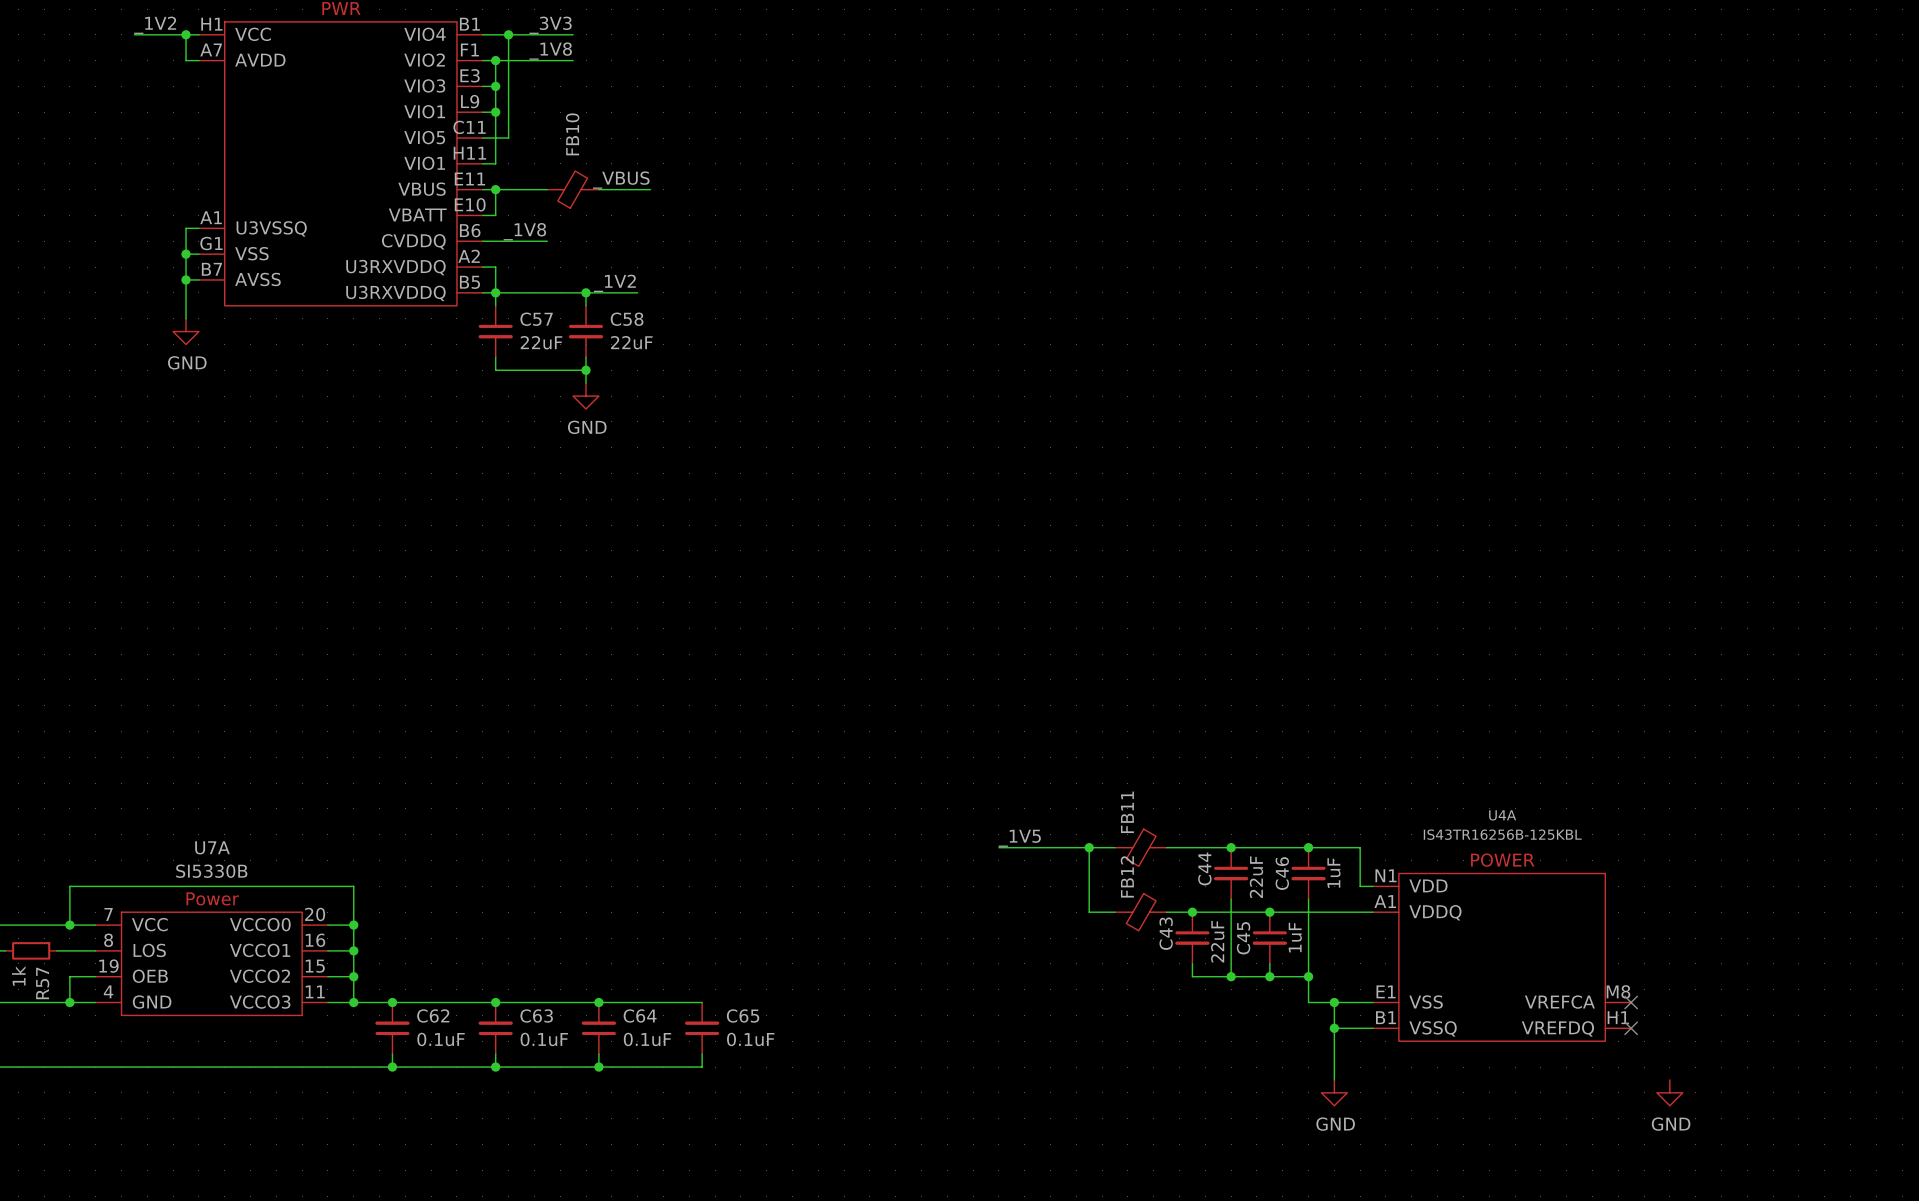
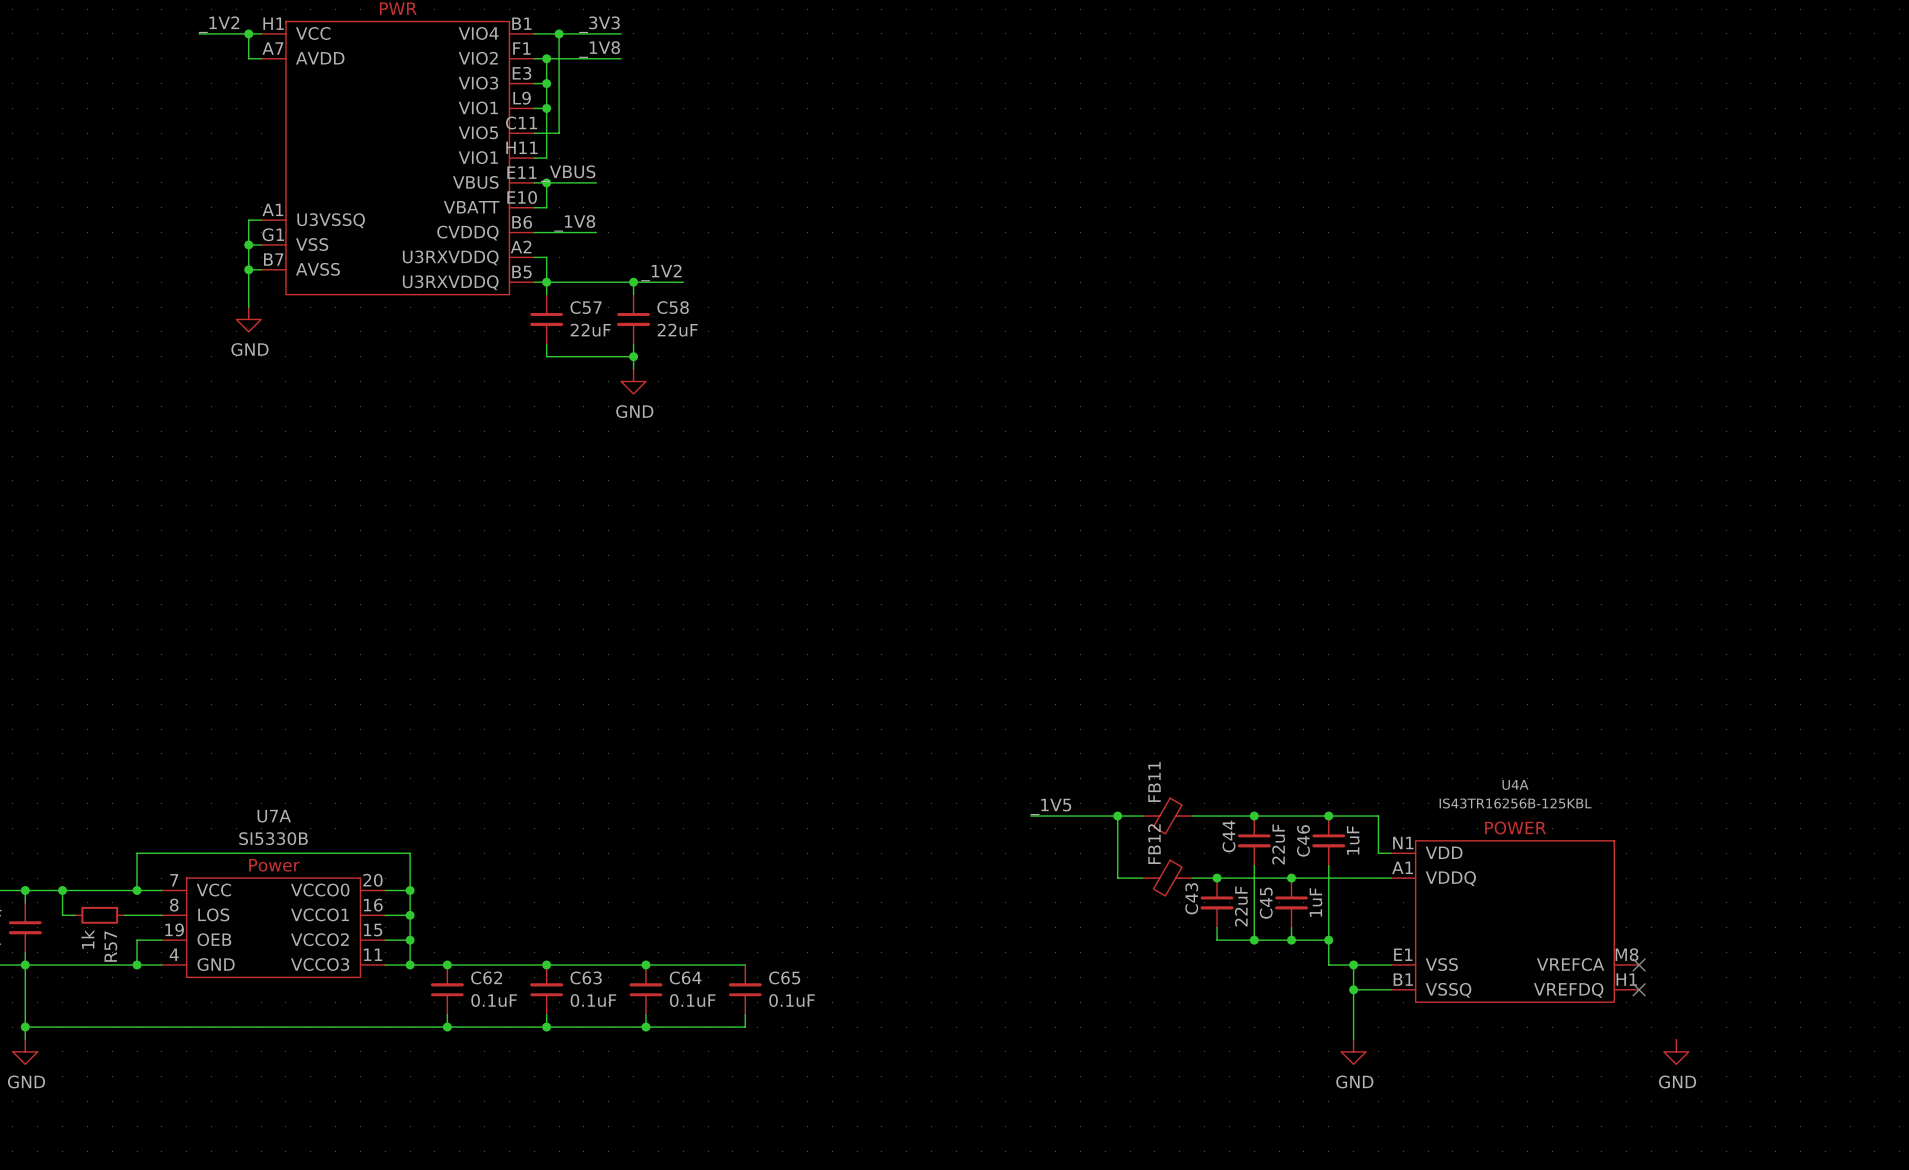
label position: _VBUS (621, 180) -> _VBUS (568, 173)
FB10: (573, 189) -> none
wire: (598, 189) (650, 189) -> none

